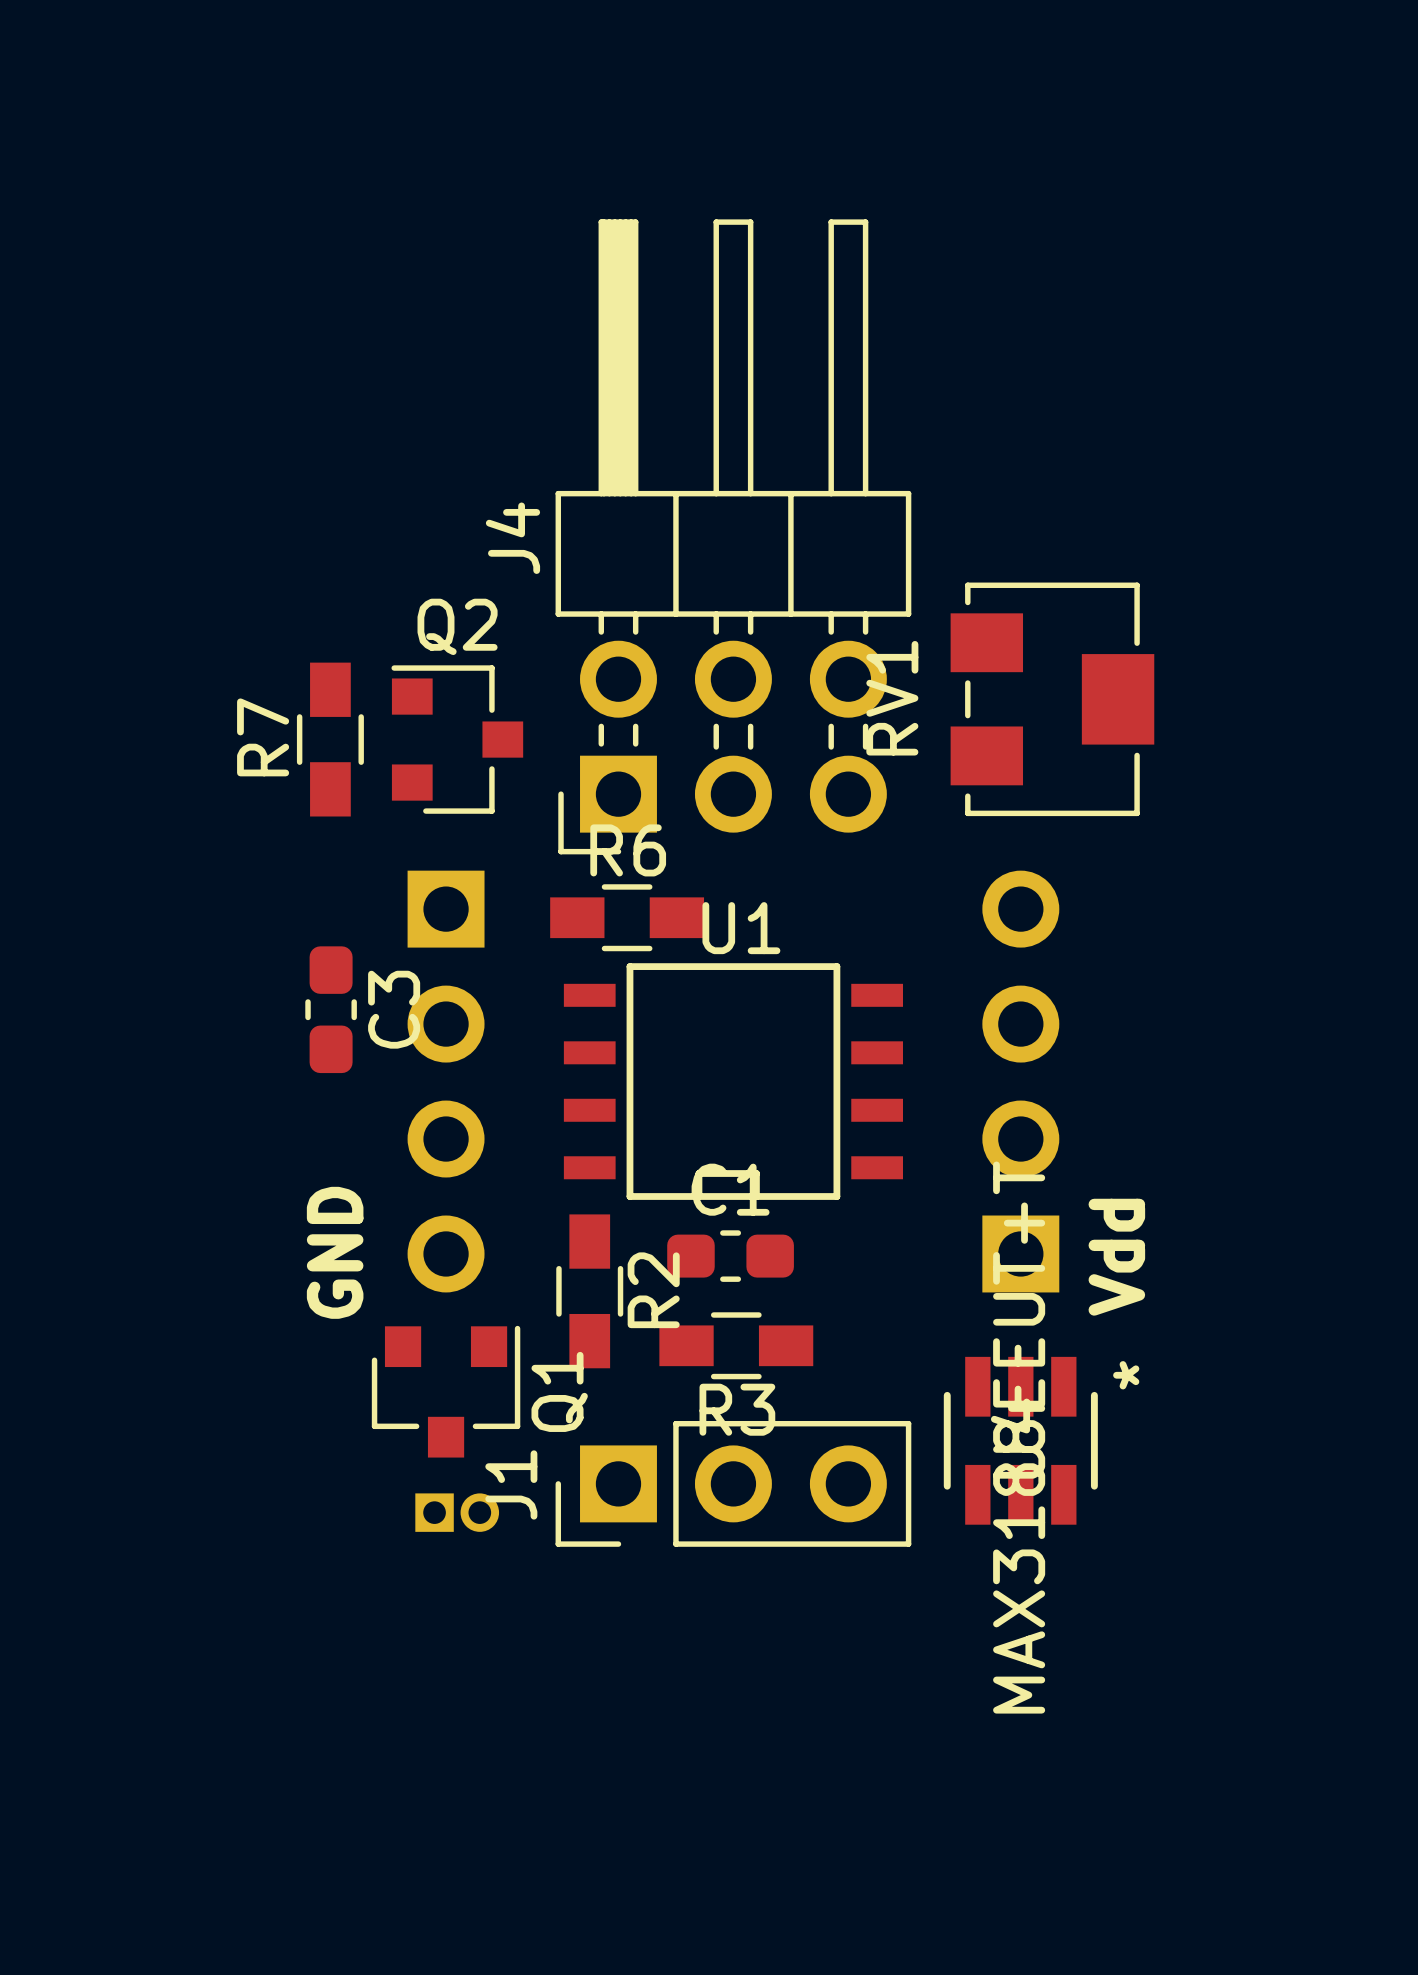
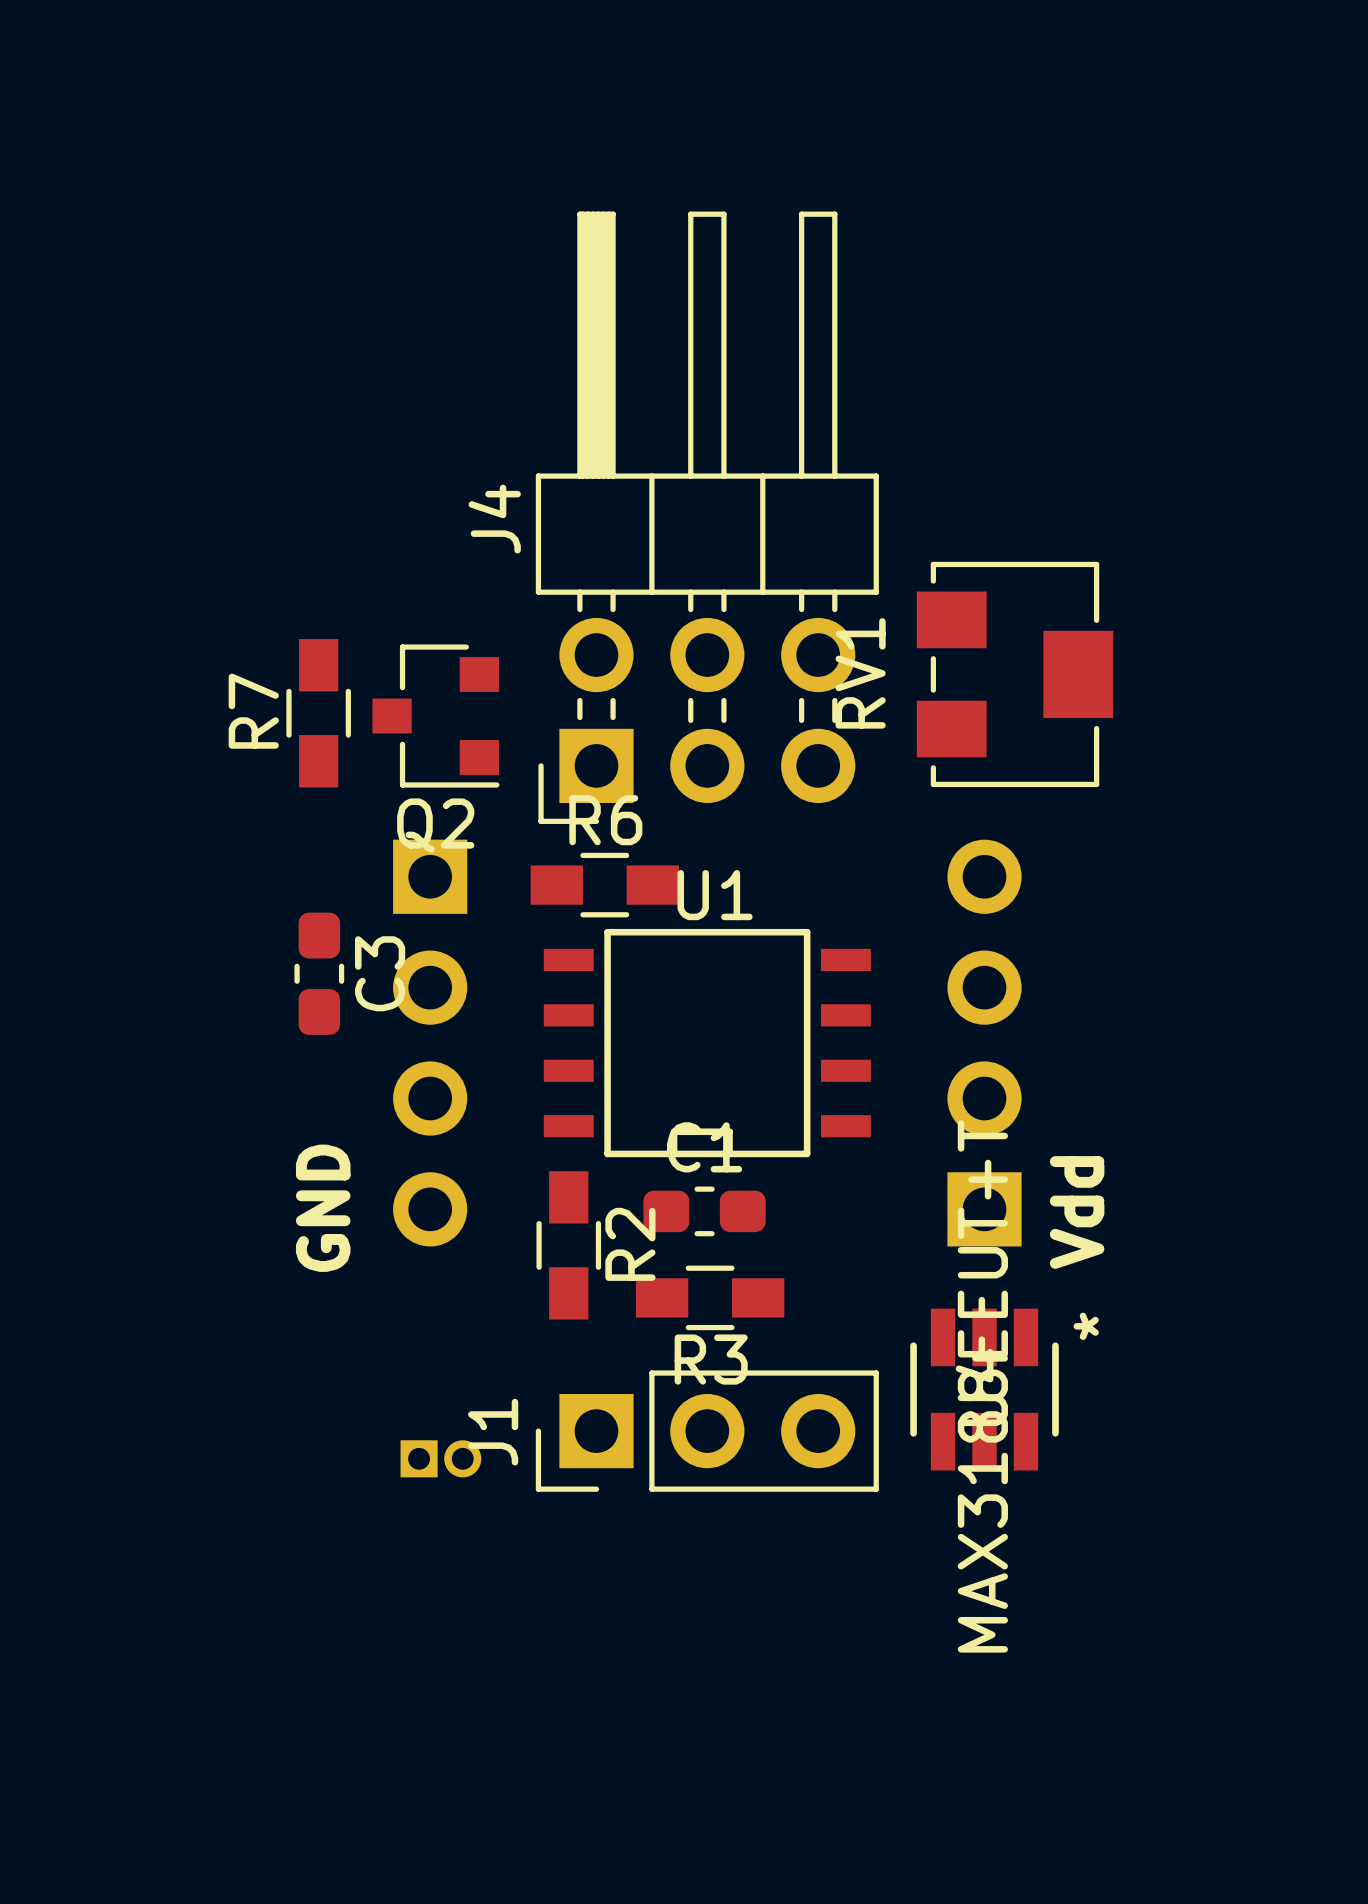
Q2 rotation: 0° (457, 739) -> 180° (435, 716)
Q1: (446, 1391) -> none

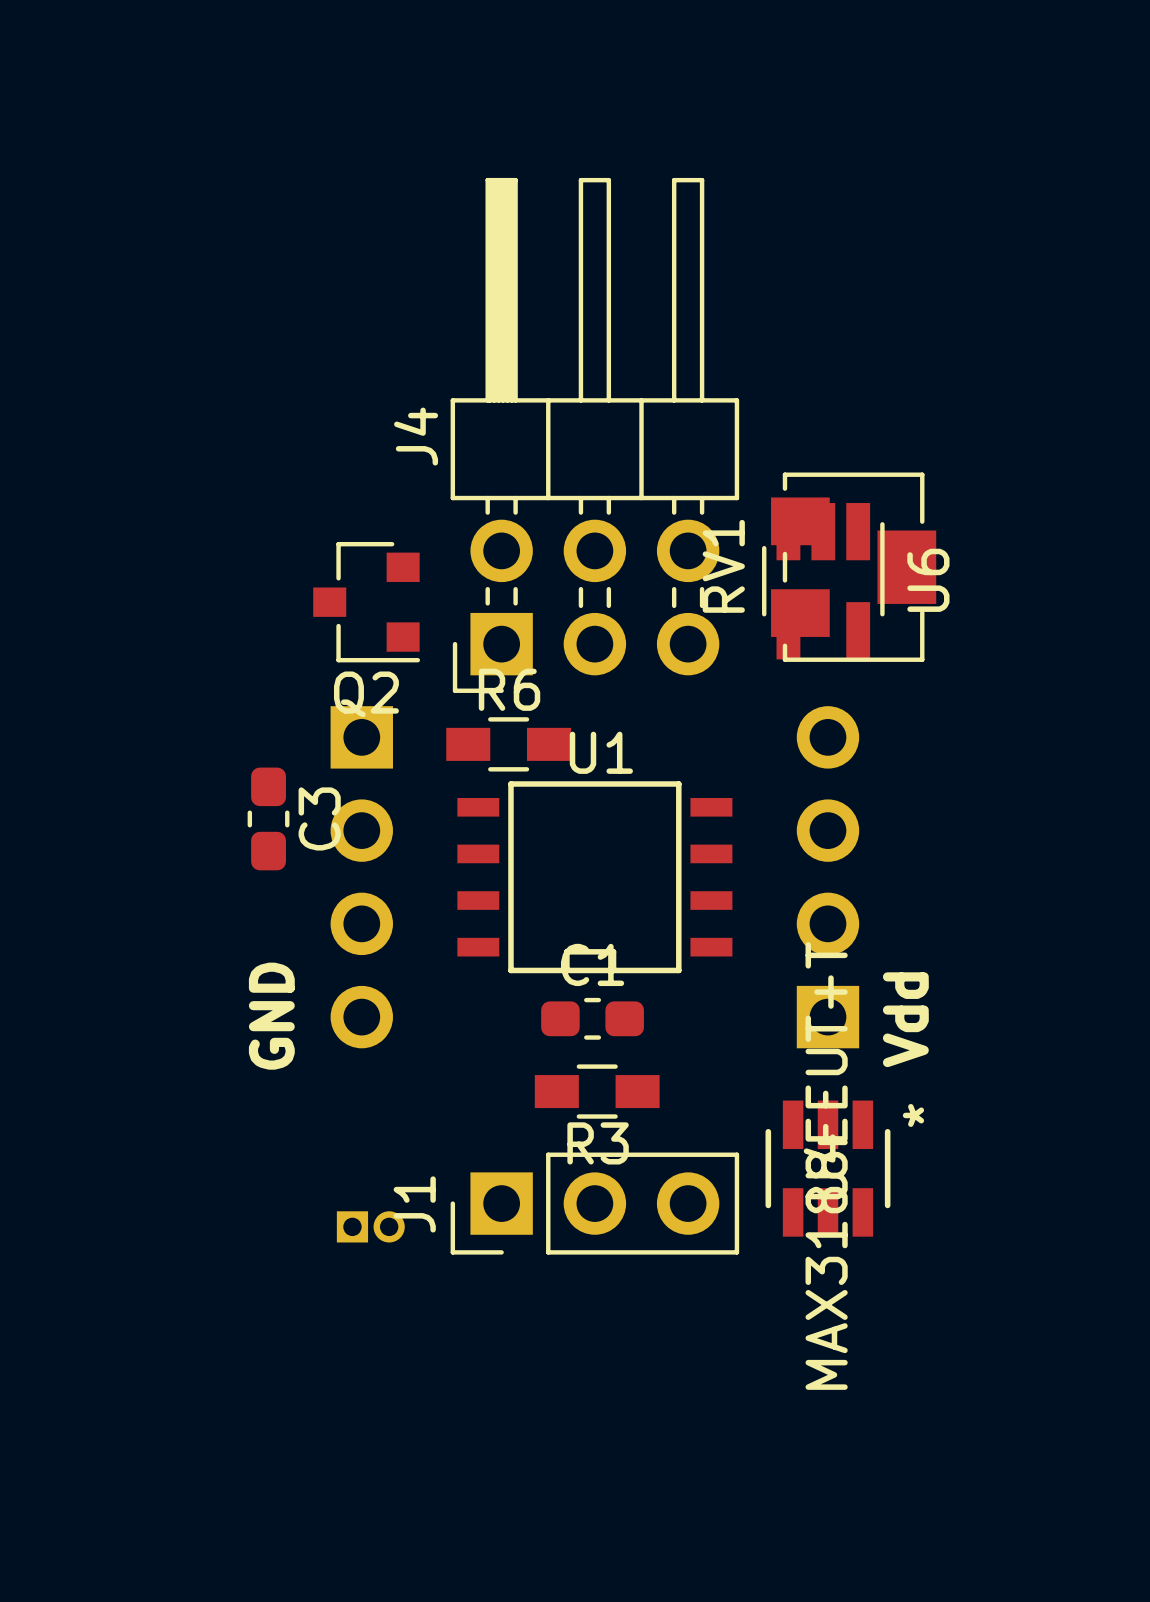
U6: none -> (823, 581)
R7: (318, 713) -> none
R2: (568, 1245) -> none

